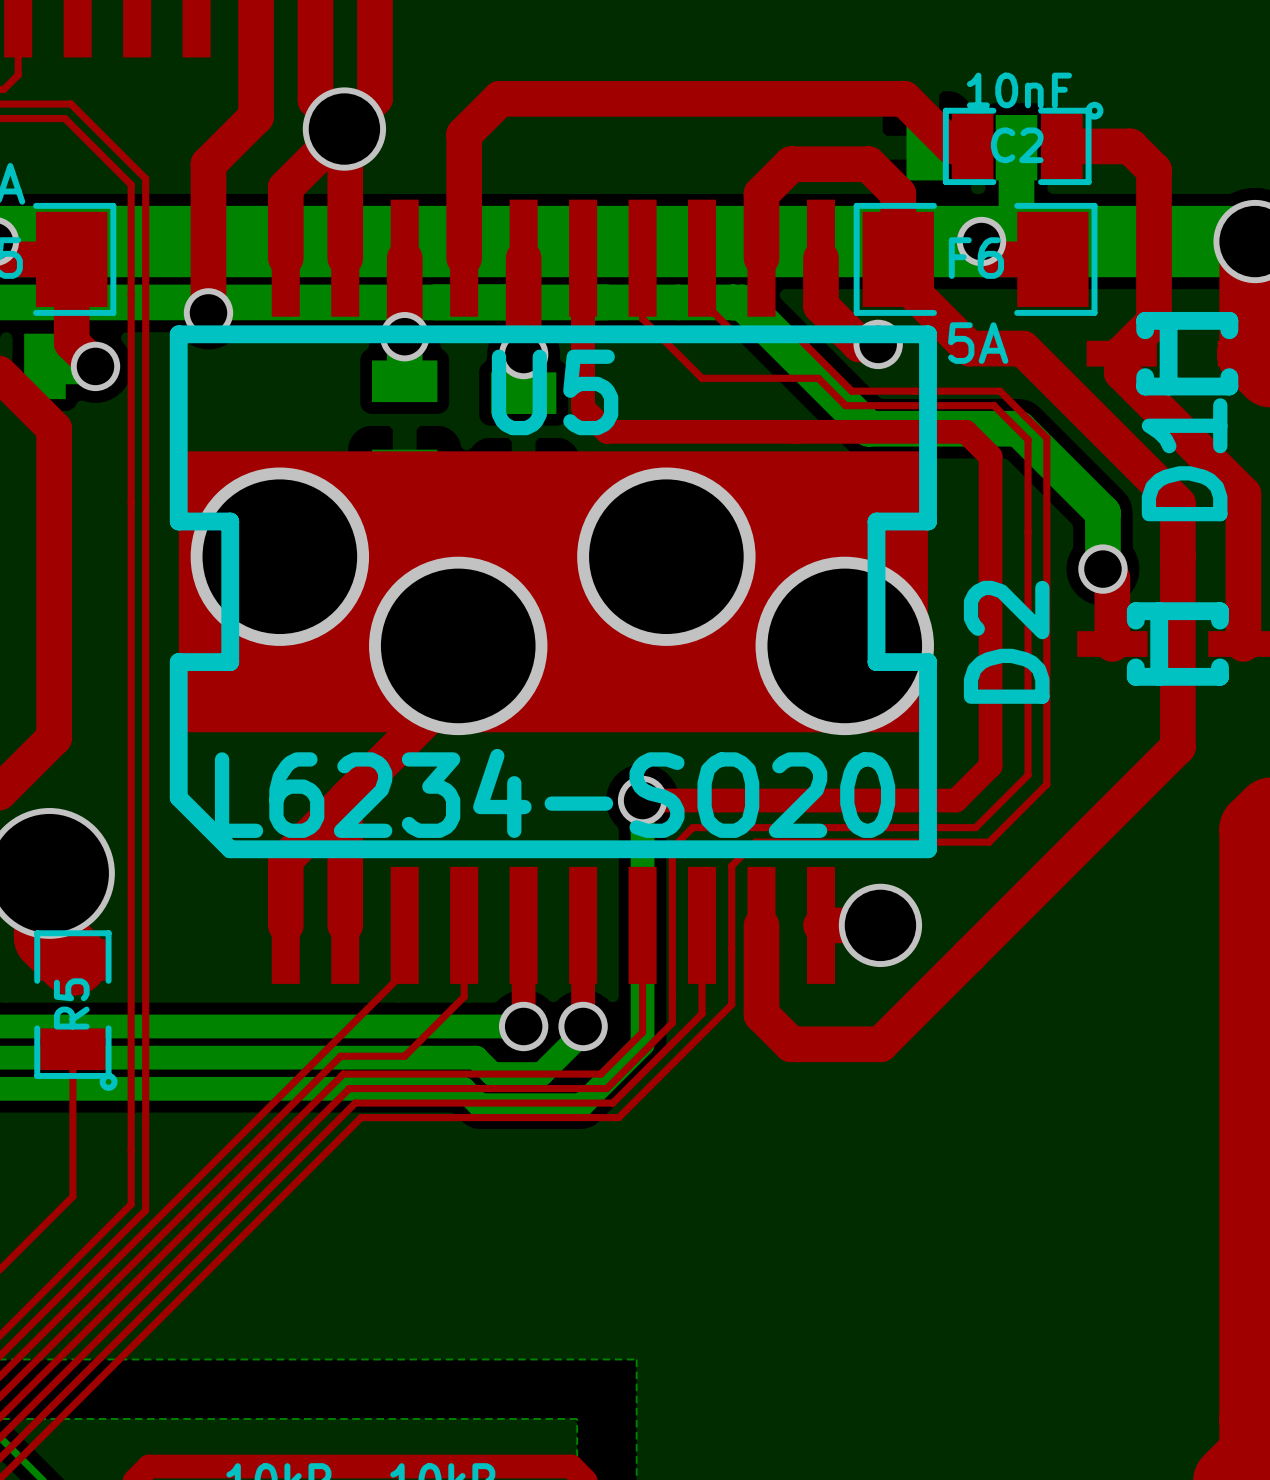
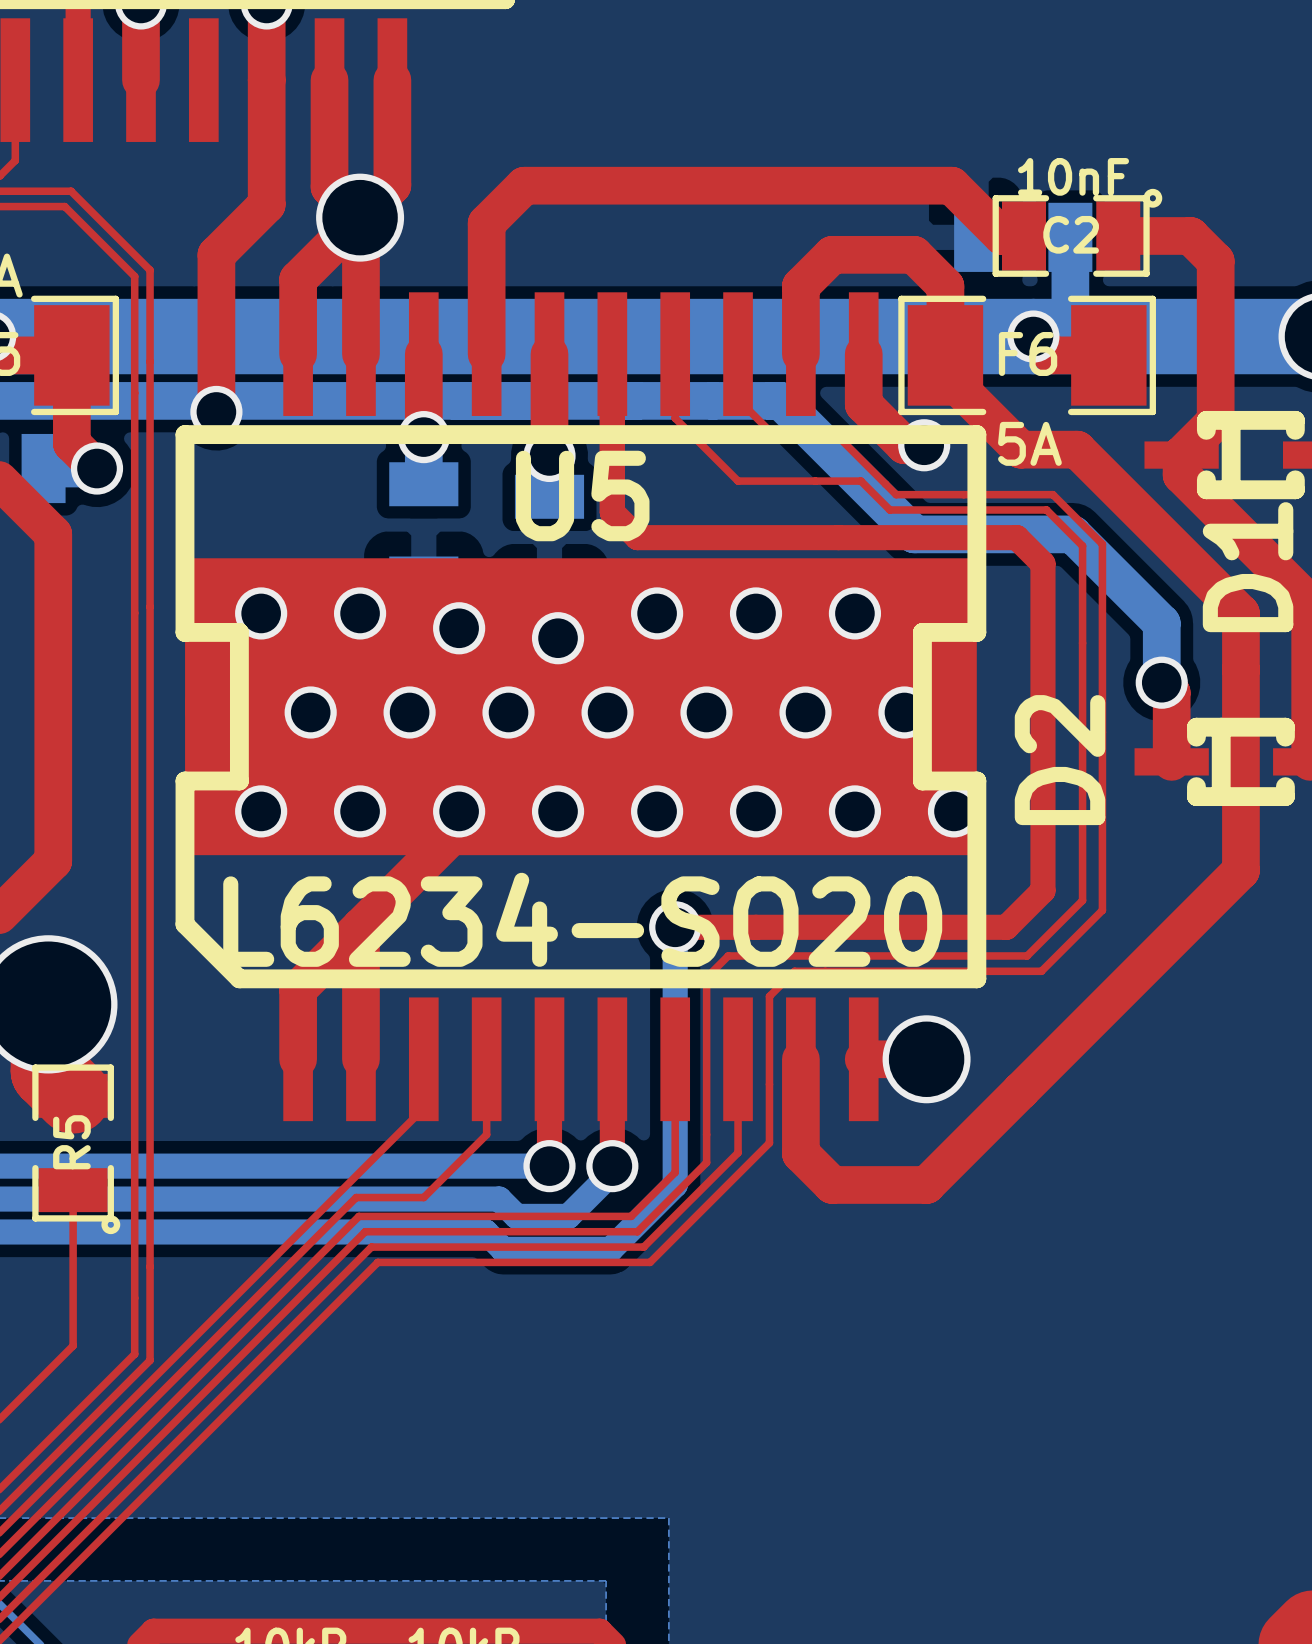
via: none -> (261, 613)
via: none -> (360, 613)
via: none -> (657, 613)
via: none -> (756, 613)
via: none -> (854, 613)
via: none -> (459, 628)
via: none -> (558, 638)
via: (279, 556) -> none
via: (666, 556) -> none
via: none -> (310, 712)
via: none -> (409, 712)
via: none -> (508, 712)
via: none -> (607, 712)
via: none -> (706, 712)
via: none -> (805, 712)
via: none -> (904, 712)
via: (458, 645) -> none
via: (844, 645) -> none
via: none -> (261, 811)
via: none -> (360, 811)
via: none -> (459, 811)
via: none -> (558, 811)
via: none -> (657, 811)
via: none -> (756, 811)
via: none -> (854, 811)
via: none -> (953, 811)

